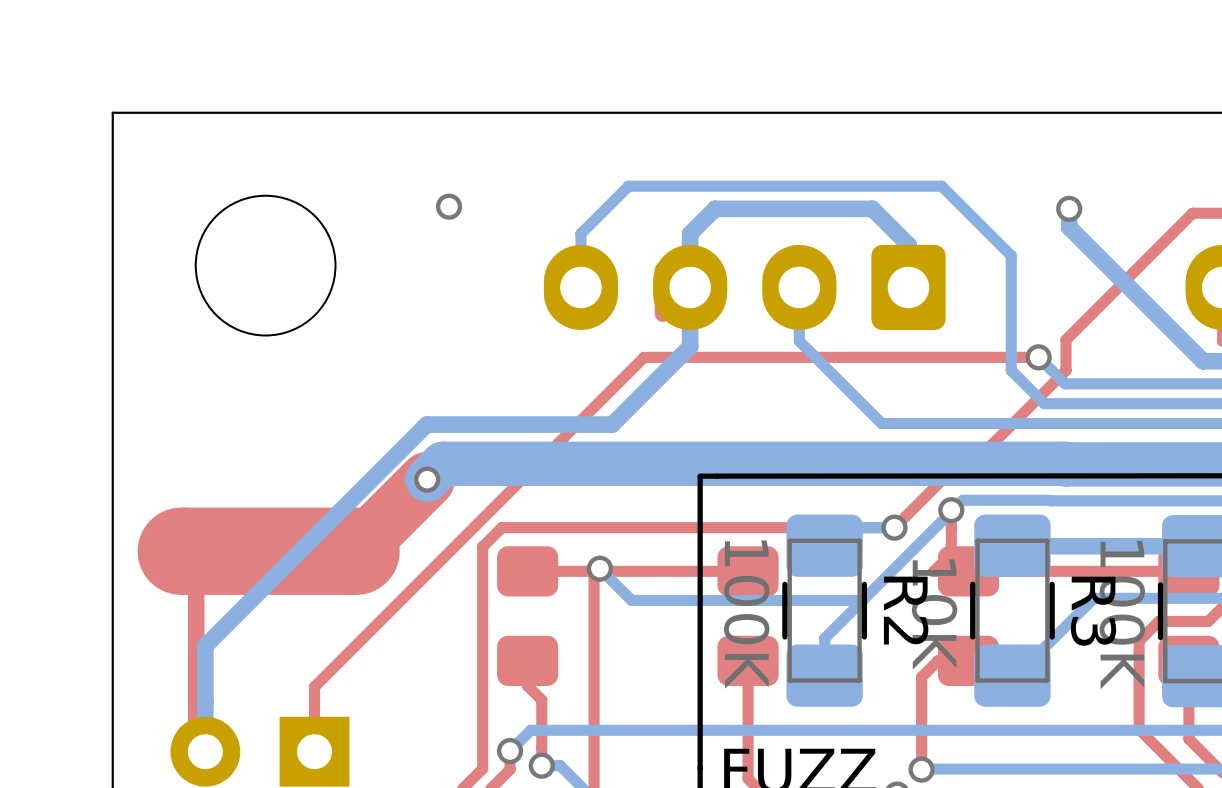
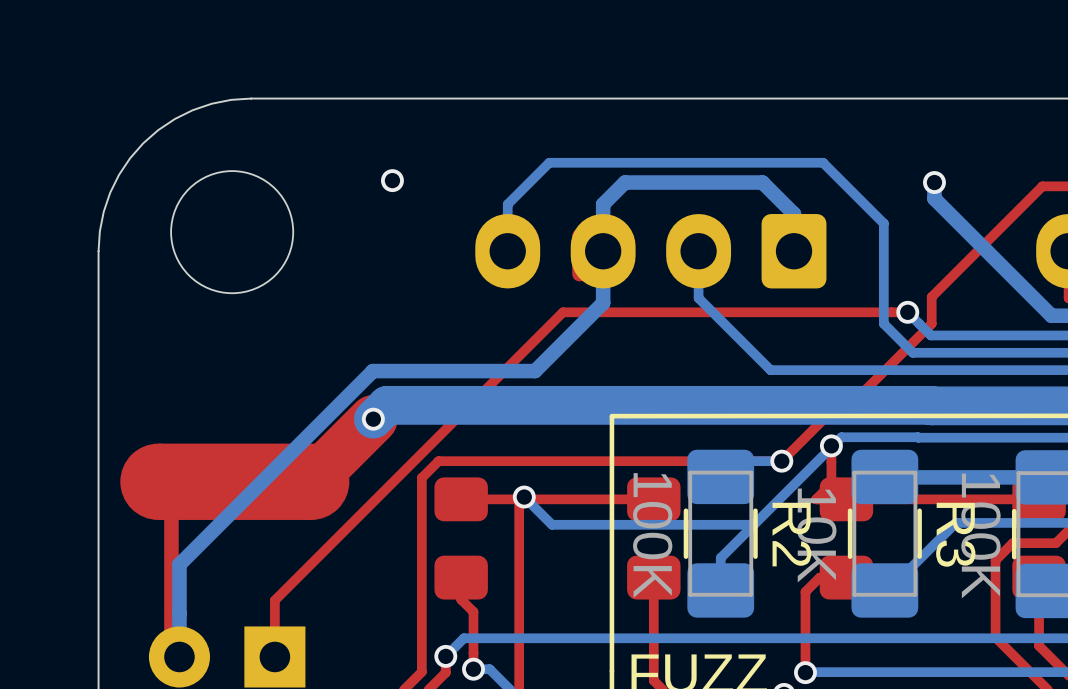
board edge: (287, 112) (112, 112) (112, 287) -> (251, 98) (211, 103) (192, 110) (158, 130) (143, 143) (119, 174) (110, 192) (103, 211) (98, 251)

